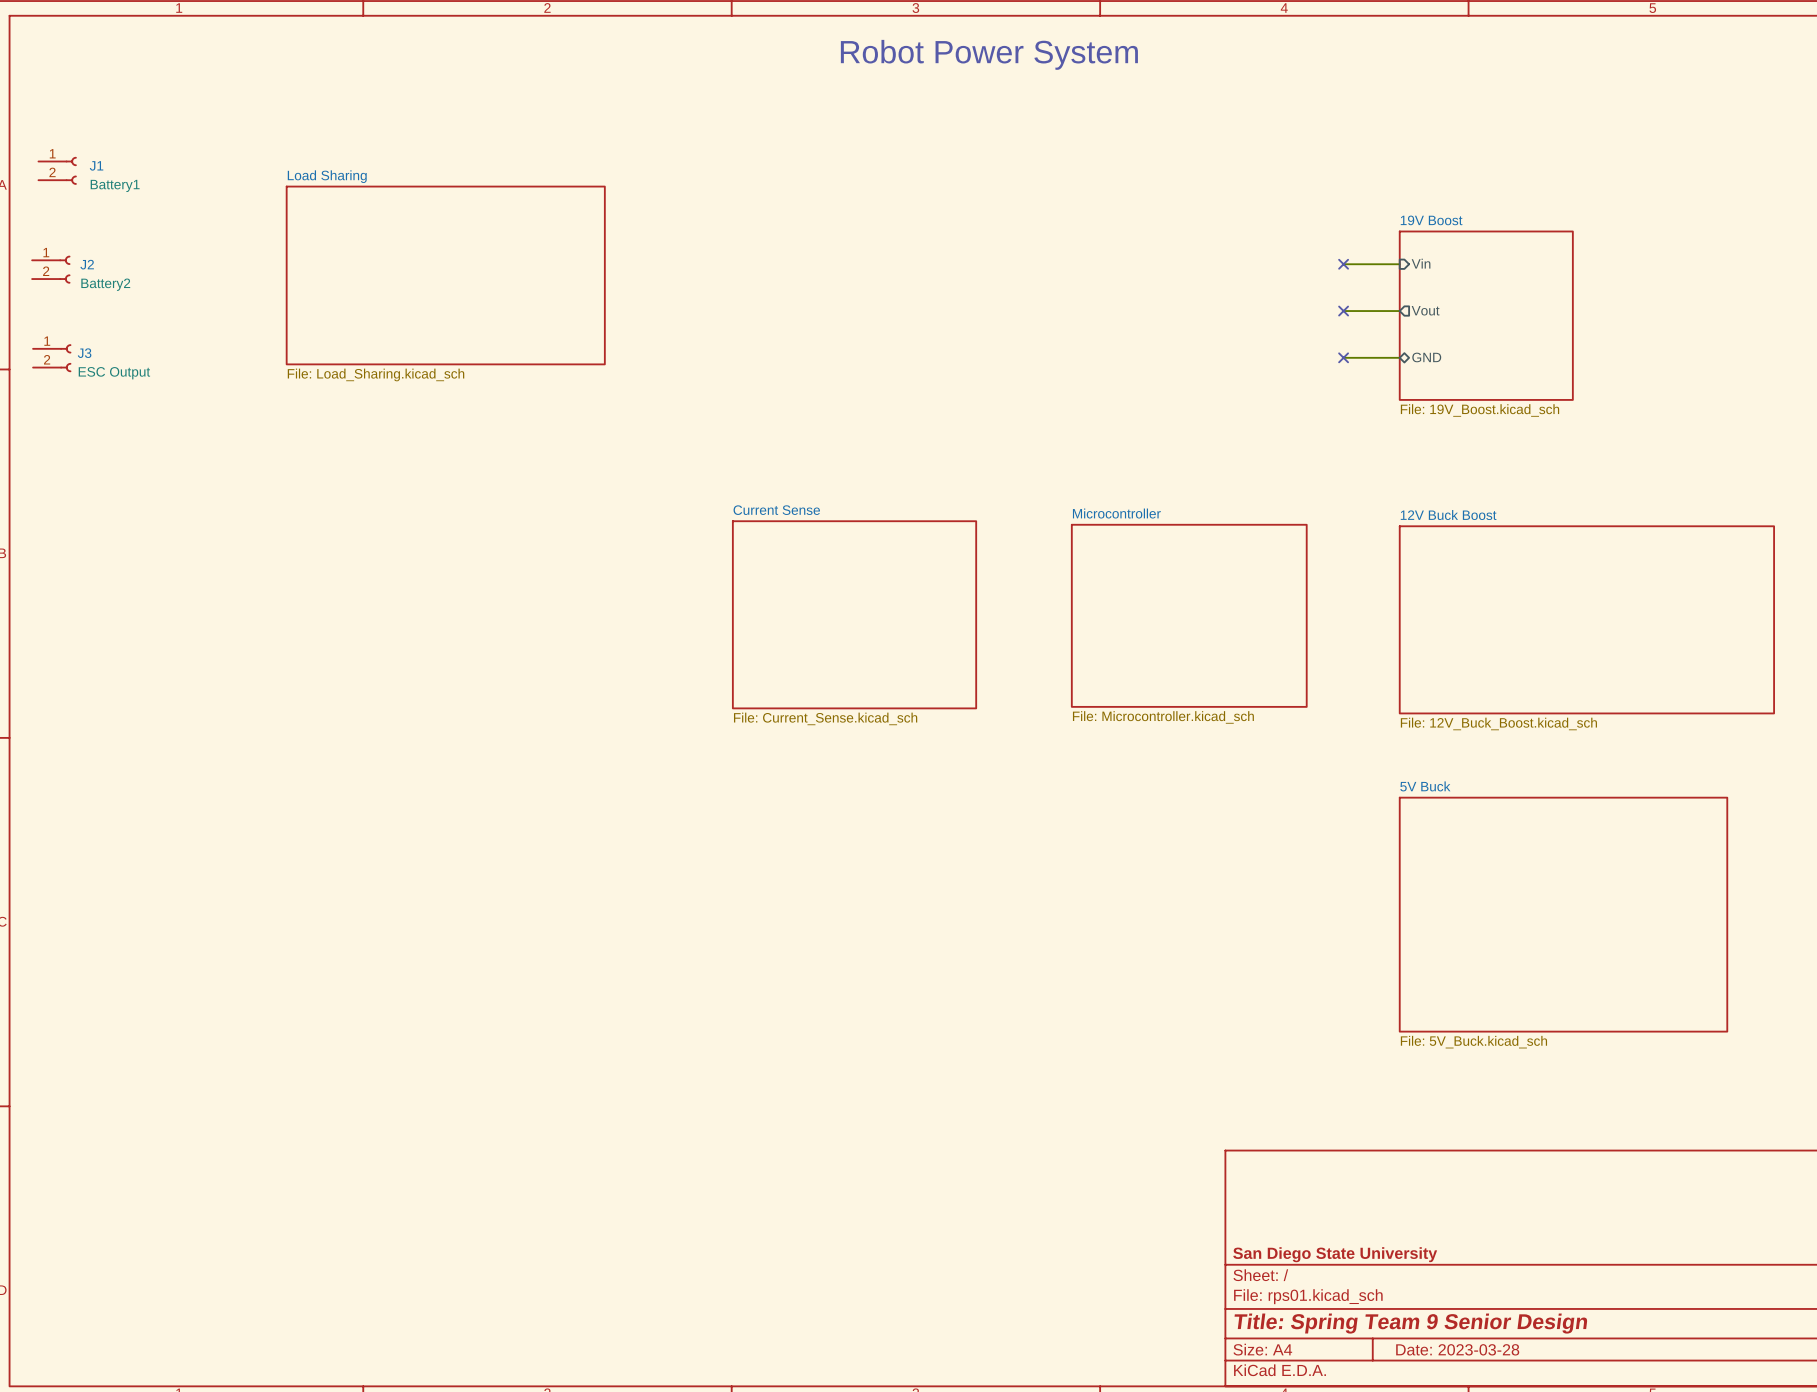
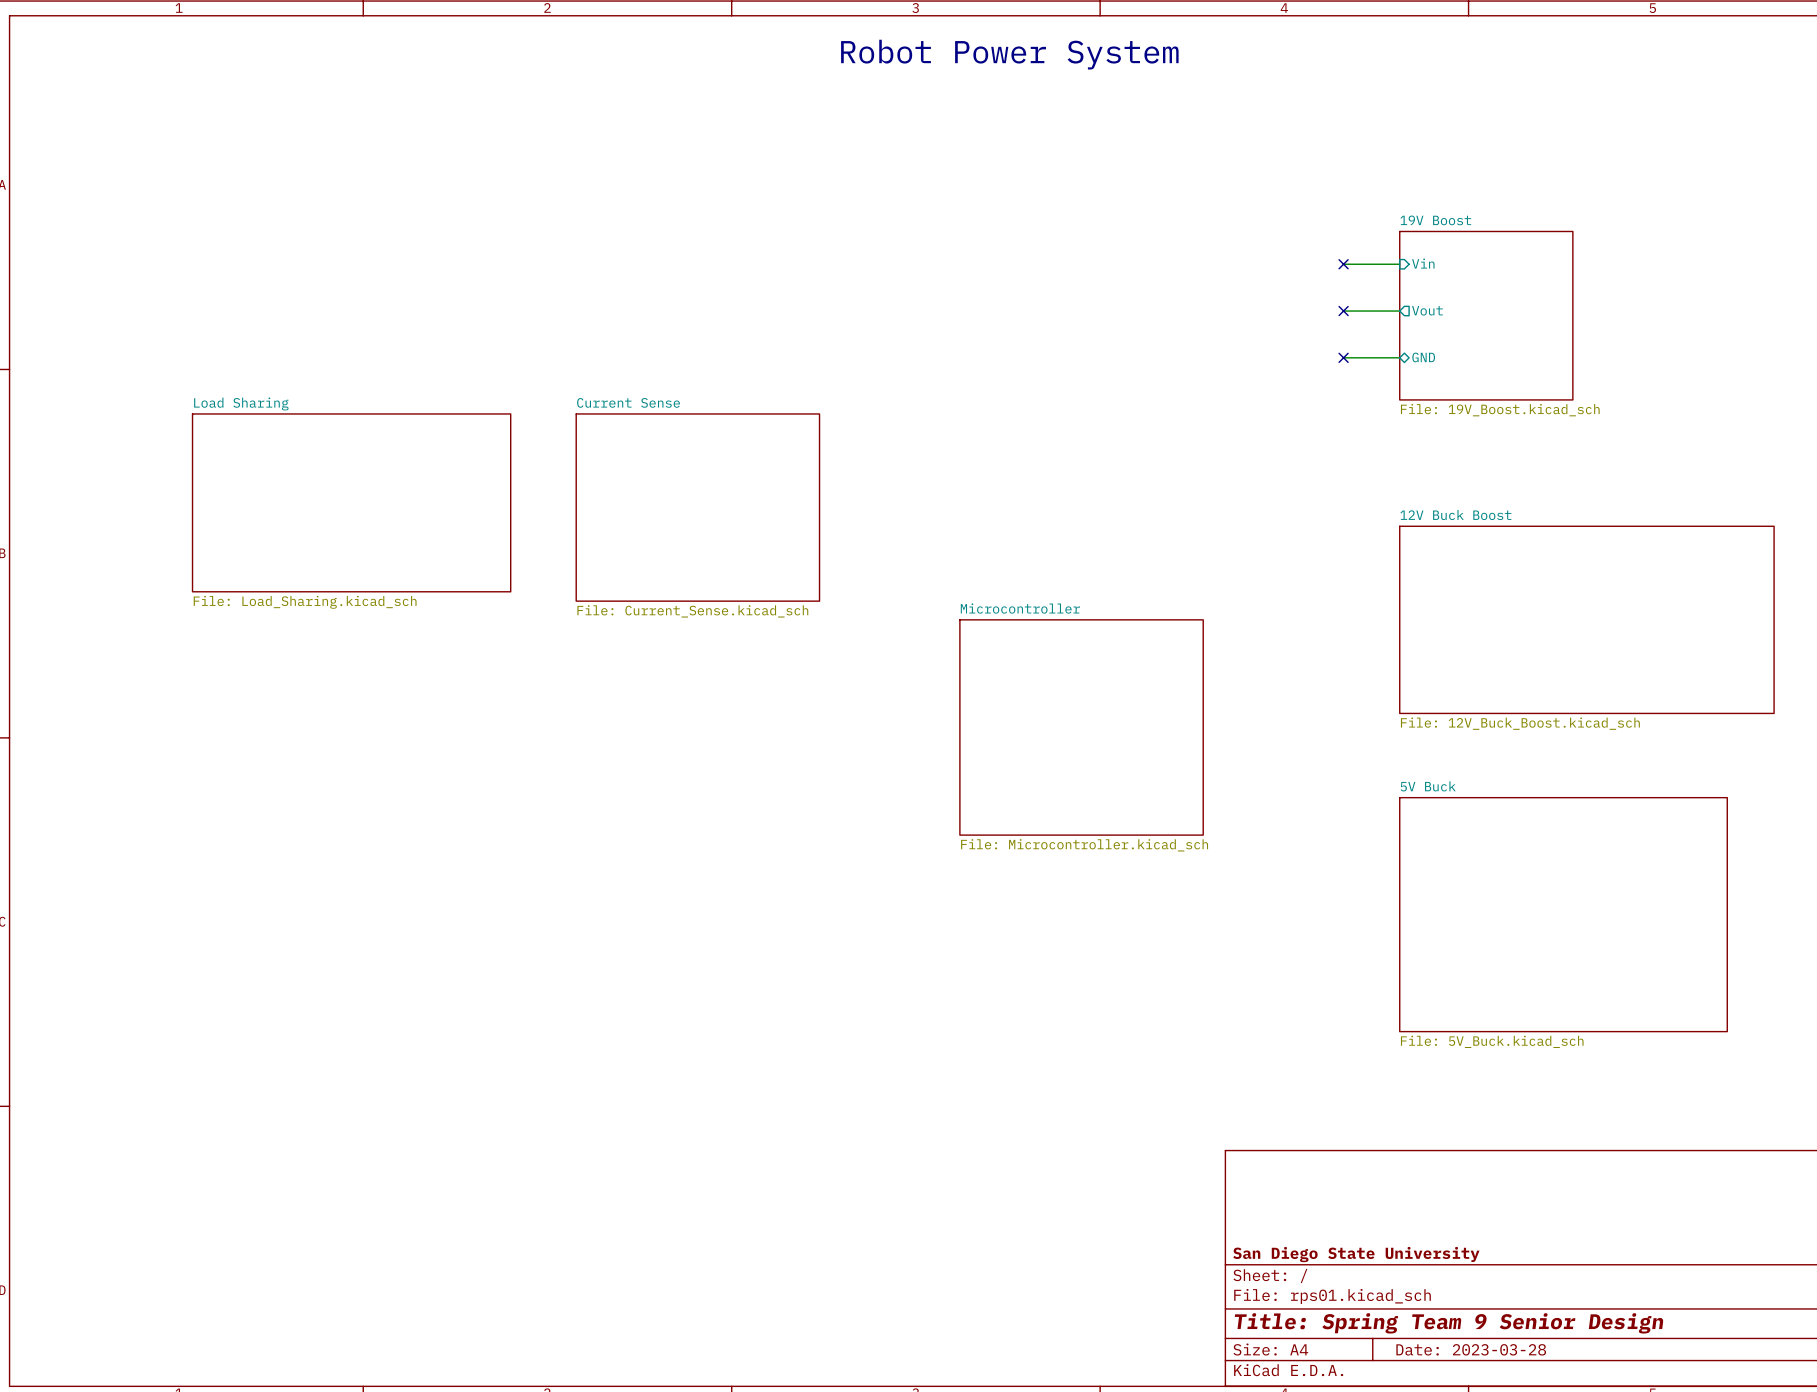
J1: Battery1 (57, 170) -> none
J2: Battery2 (51, 269) -> none
sheet Load Sharing: File: Load_Sharing.kicad_sch (445, 275) -> none
J3: ESC Output (52, 358) -> none
sheet Load Sharing: none -> File: Load_Sharing.kicad_sch (351, 502)
sheet Current Sense: none -> File: Current_Sense.kicad_sch (697, 507)
sheet Current Sense: File: Current_Sense.kicad_sch (854, 614) -> none
sheet Microcontroller: File: Microcontroller.kicad_sch (1189, 615) -> none
sheet Microcontroller: none -> File: Microcontroller.kicad_sch (1081, 727)

